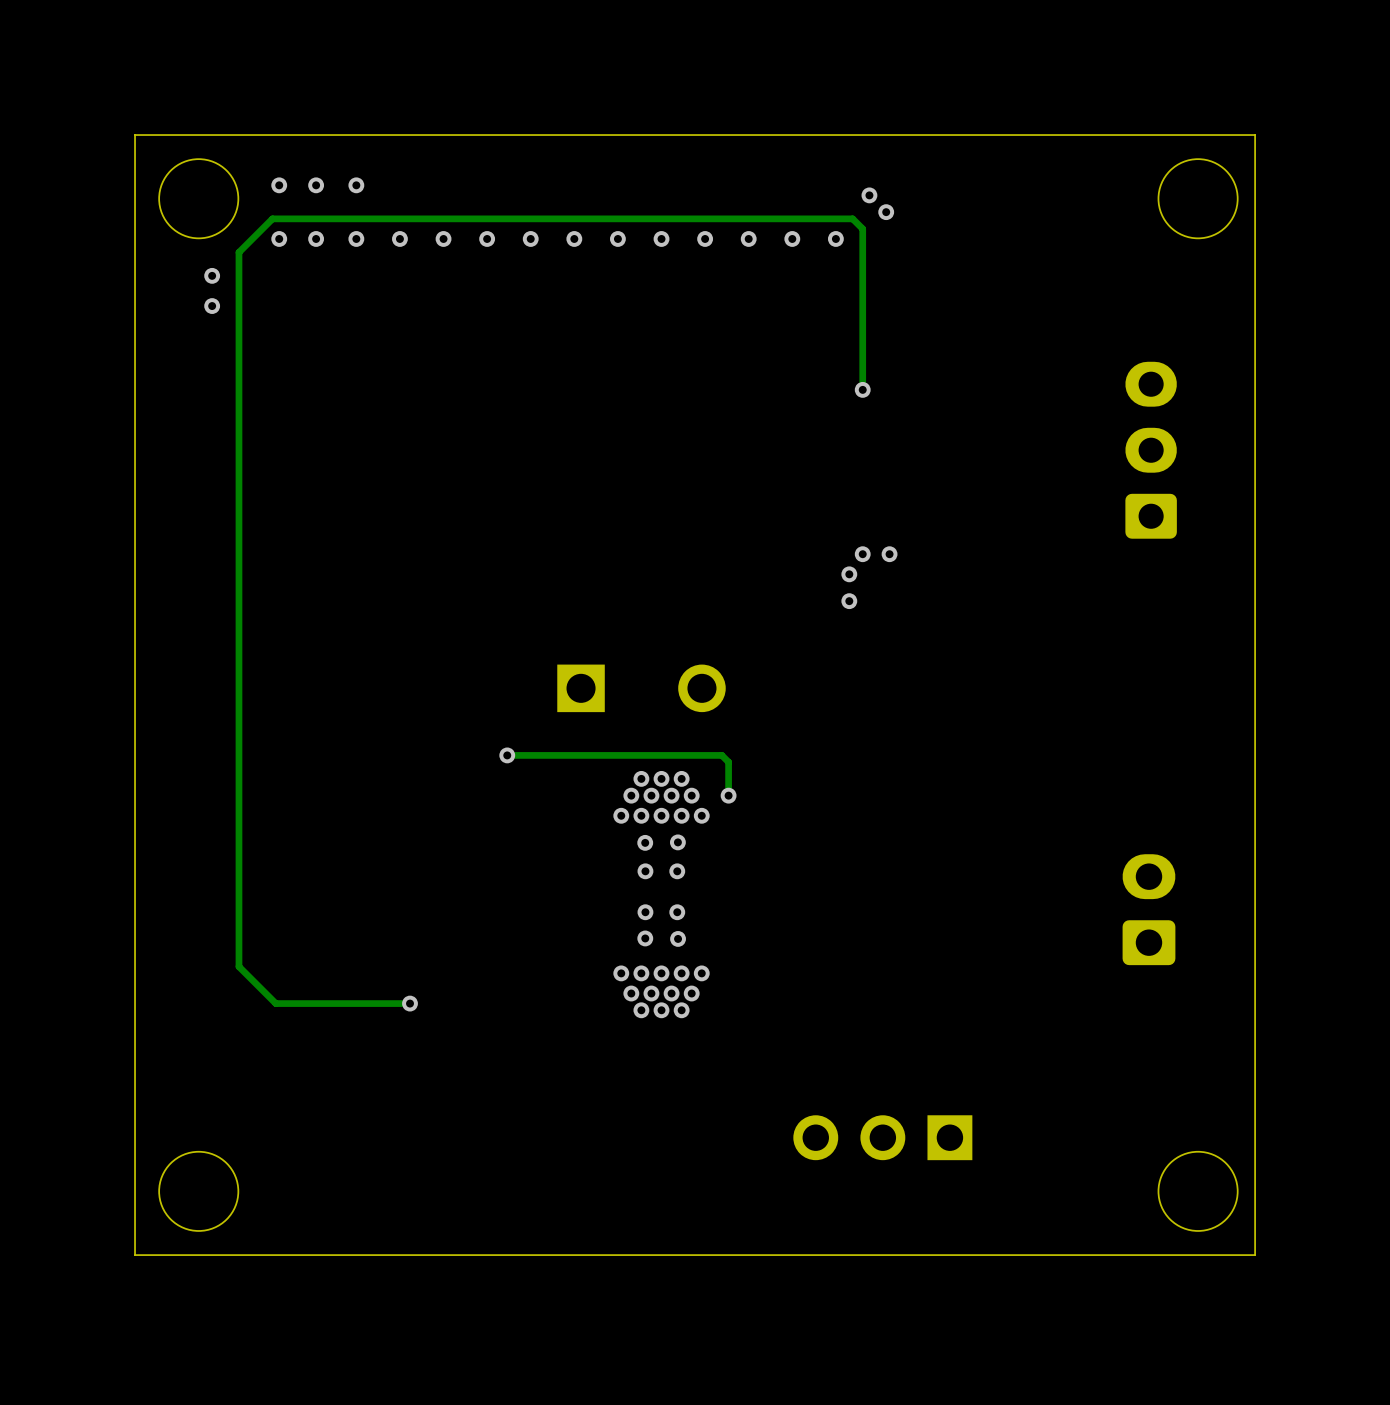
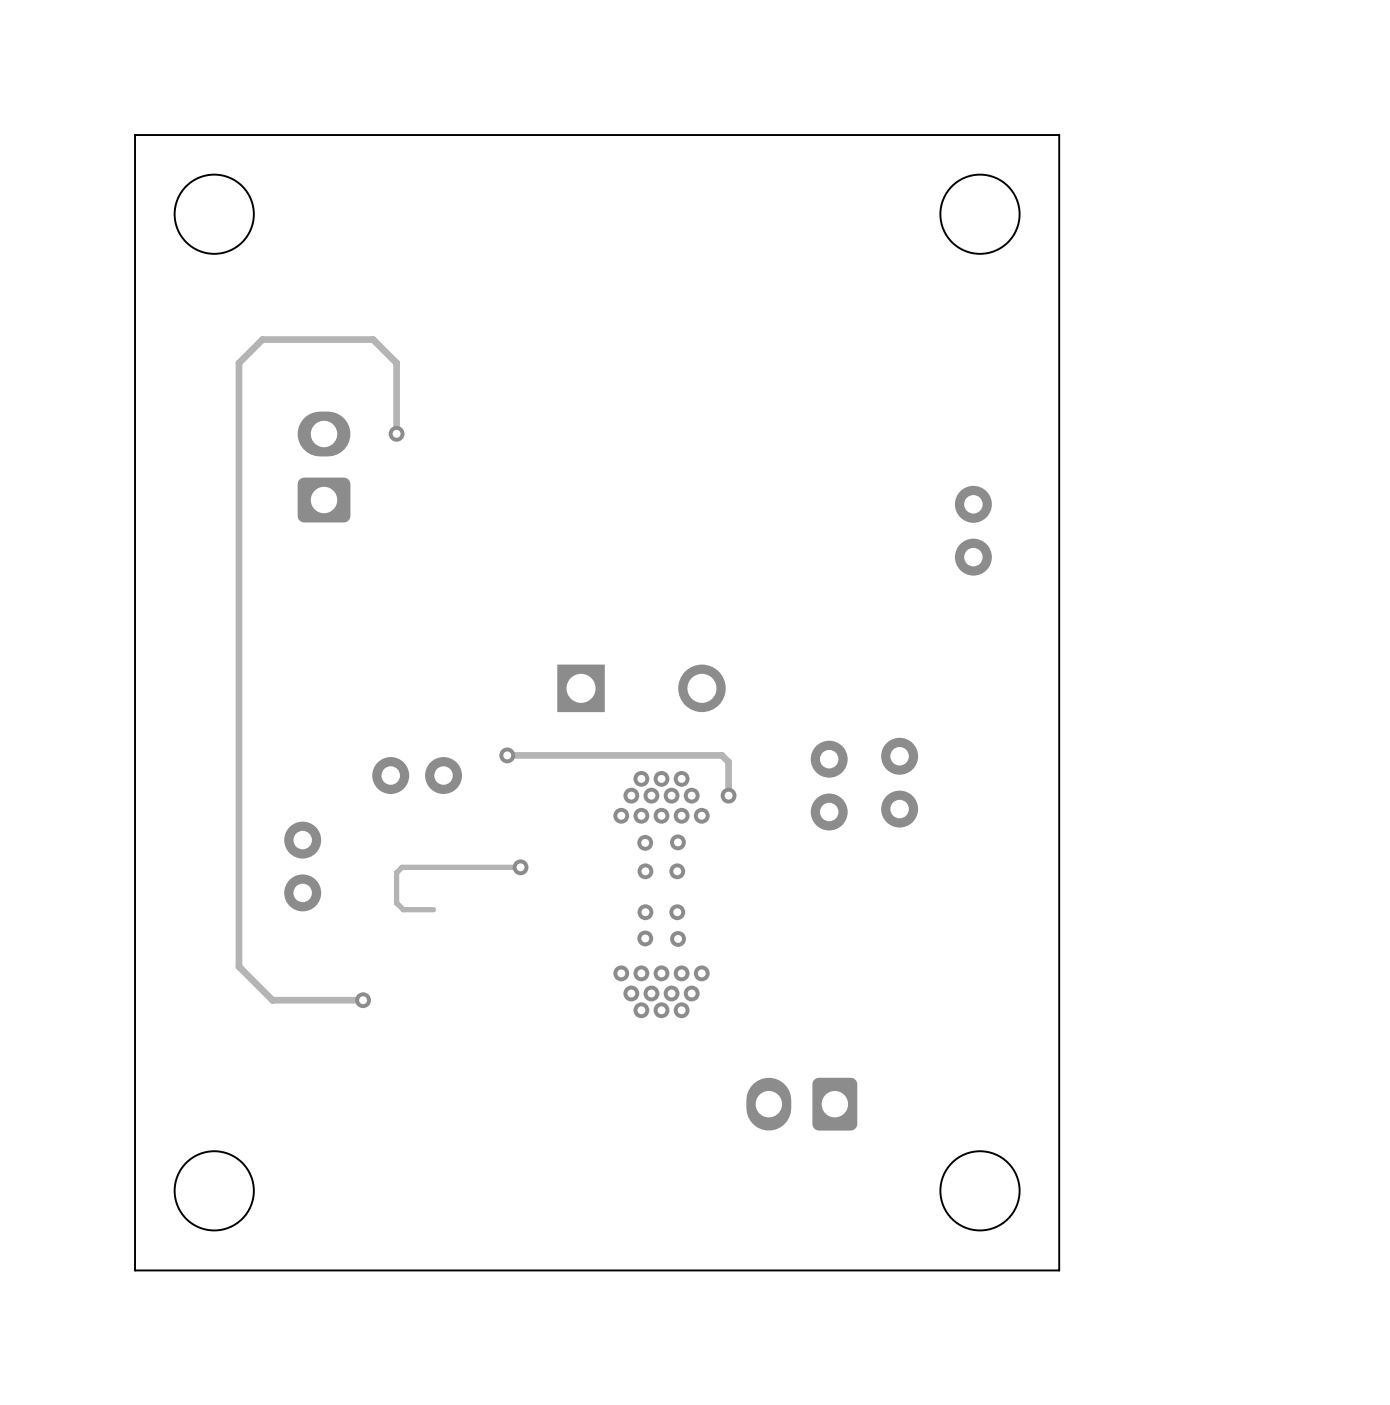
board edge: (1059, 135) (1255, 135) (1255, 1255) (135, 1255) -> (1059, 135) (1059, 1270) (135, 1270) (135, 1255)
via: (279, 185) -> none
via: (316, 185) -> none
via: (356, 185) -> none
via: (869, 195) -> none
round board edge position: (198, 198) -> (214, 214)
round board edge position: (1198, 198) -> (979, 214)
via: (886, 212) -> none
via: (279, 238) -> none
via: (316, 238) -> none
via: (356, 238) -> none
via: (399, 238) -> none
via: (443, 238) -> none
via: (487, 238) -> none
via: (530, 238) -> none
via: (574, 238) -> none
via: (617, 238) -> none
via: (661, 238) -> none
via: (705, 238) -> none
via: (748, 238) -> none
via: (792, 238) -> none
via: (835, 238) -> none
via: (212, 275) -> none
via: (212, 306) -> none
track: (238, 363) (238, 252) (272, 218) (852, 218) (862, 228) (862, 389) -> (238, 363) (262, 339) (373, 339) (396, 363) (396, 433)
via: (862, 389) -> none
via: none -> (396, 433)
part: (1151, 450) -> none
part: none -> (324, 467)
part: none -> (973, 530)
via: (862, 554) -> none
via: (889, 554) -> none
via: (849, 574) -> none
via: (849, 601) -> none
part: none -> (417, 775)
part: none -> (899, 782)
part: none -> (829, 785)
part: none -> (302, 866)
track: none -> (520, 867) (402, 867) (396, 872) (396, 902) (403, 909) (433, 909)
via: none -> (520, 867)
part rotation: 0° (1148, 909) -> 90° counterclockwise (801, 1104)
part position: (1148, 909) -> (801, 1104)
track: (272, 1000) (275, 1003) (410, 1003) -> (272, 1000) (363, 1000)
via position: (410, 1003) -> (363, 1000)
part: (882, 1137) -> none
round board edge position: (198, 1191) -> (214, 1190)
round board edge position: (1198, 1191) -> (979, 1190)

